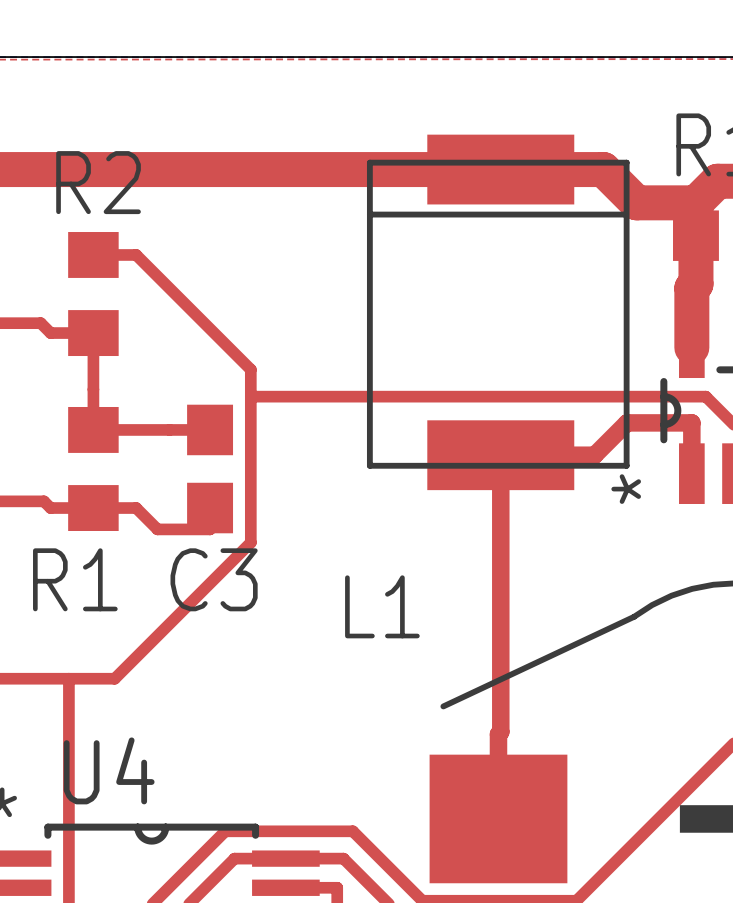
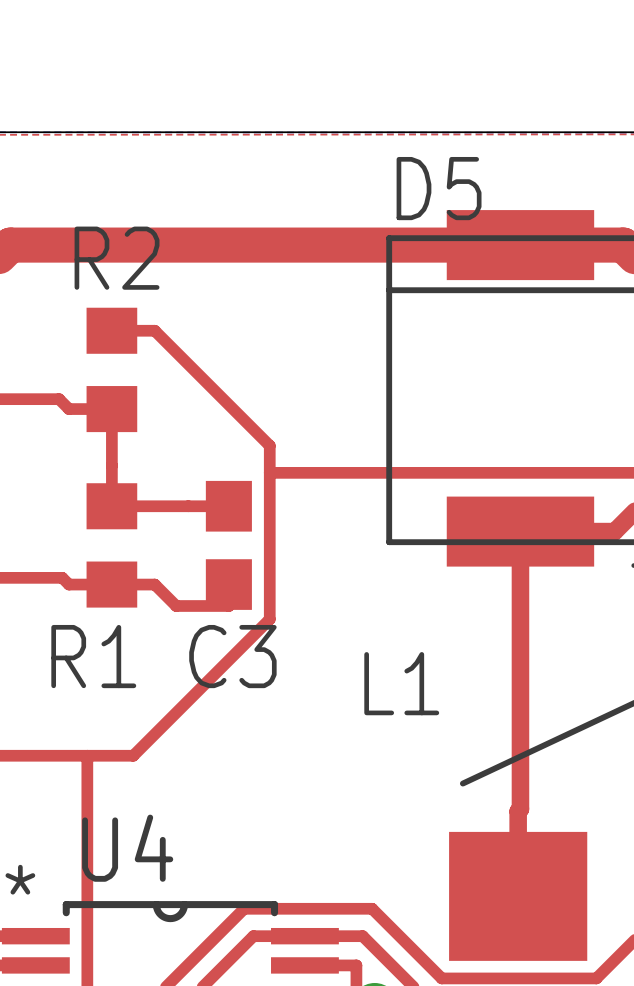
D5 name: none -> D5 (439, 188)

